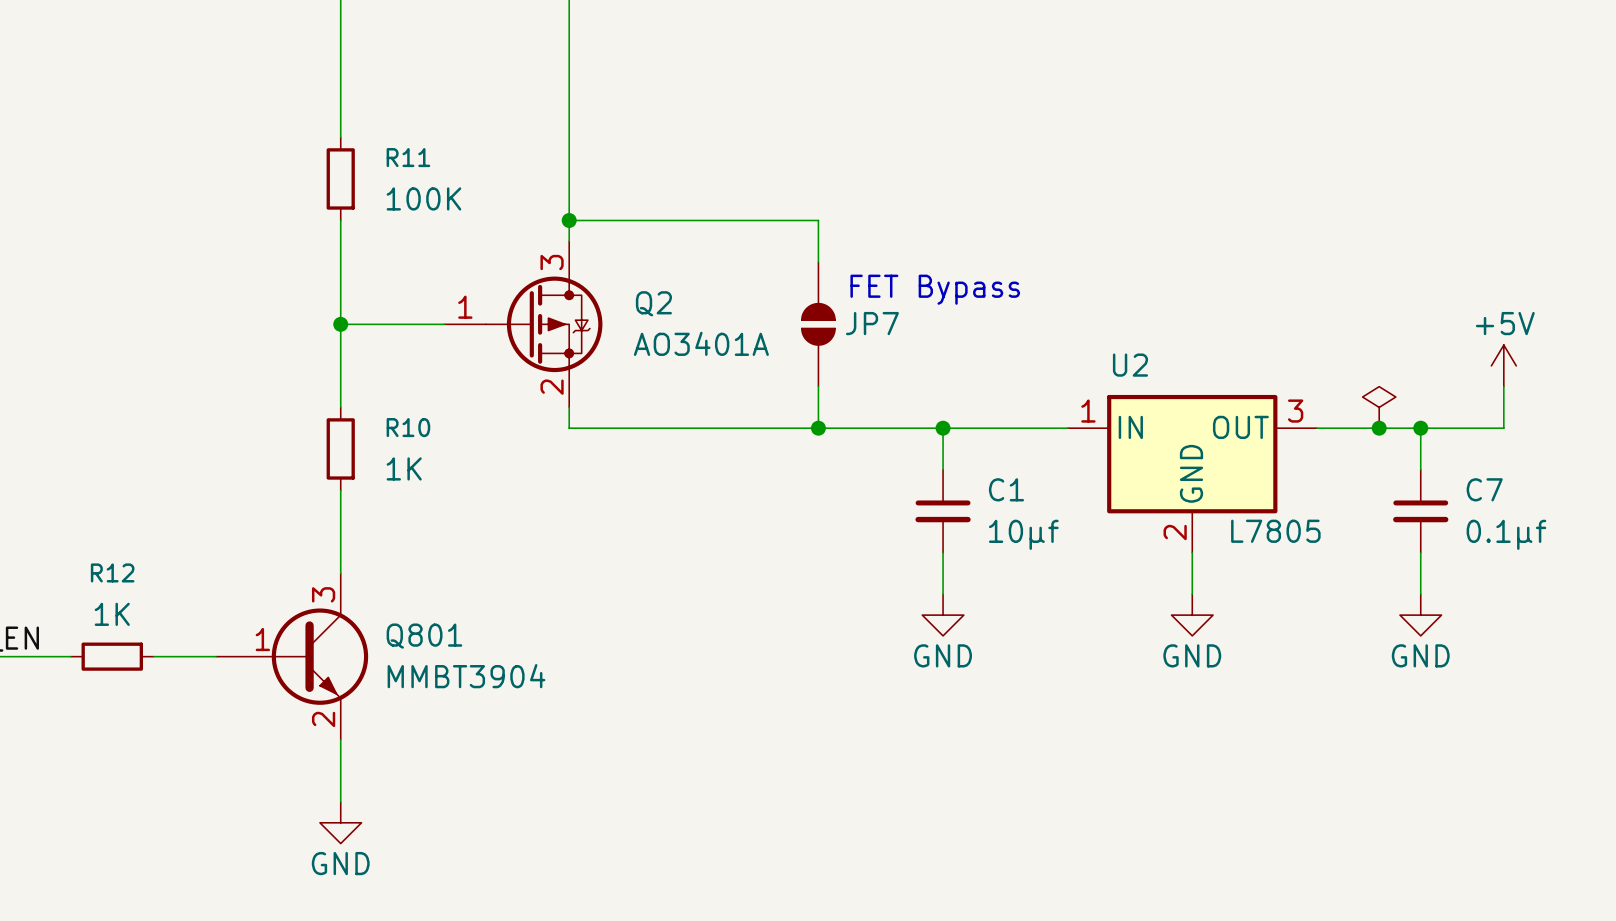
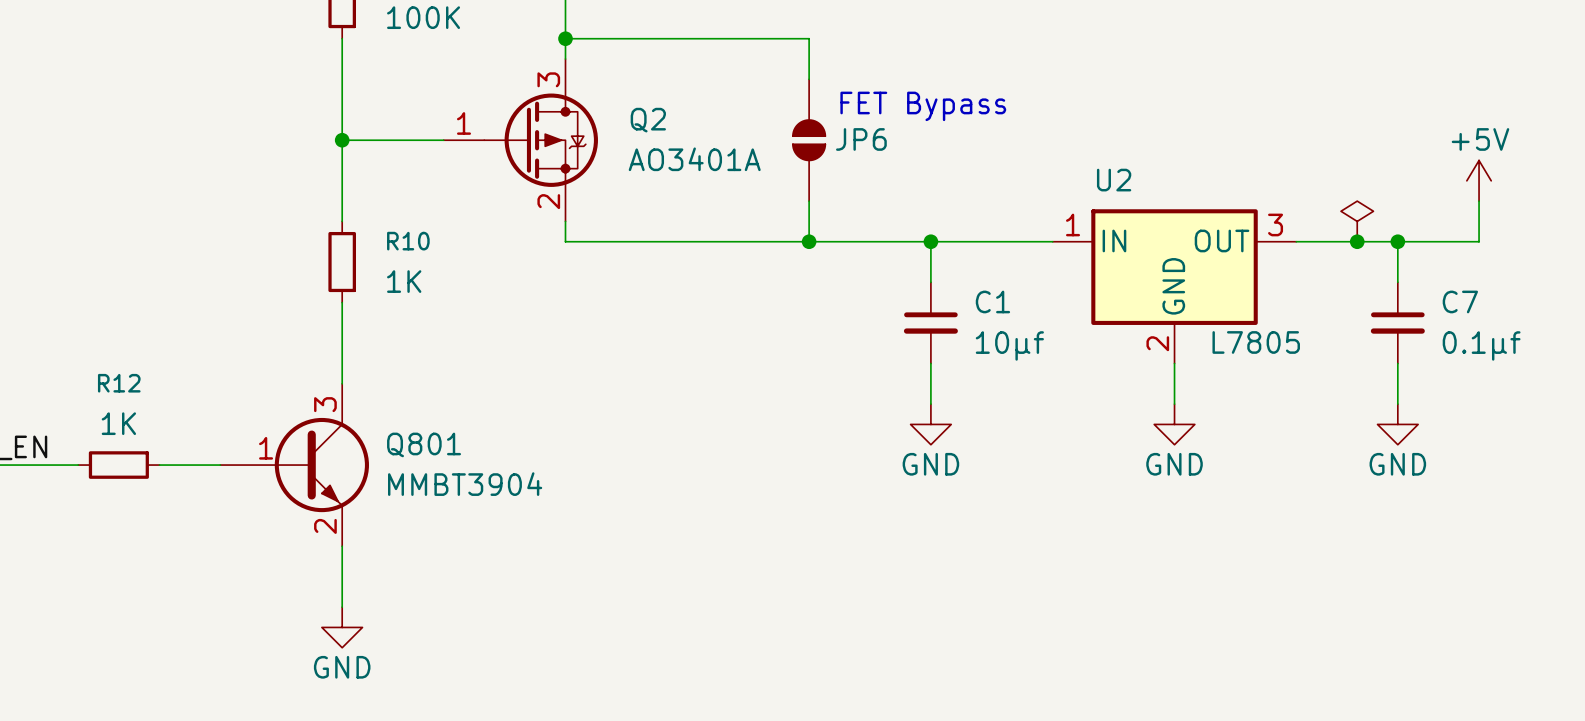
JP7 name: JP7 (872, 323) -> JP6 (861, 139)

